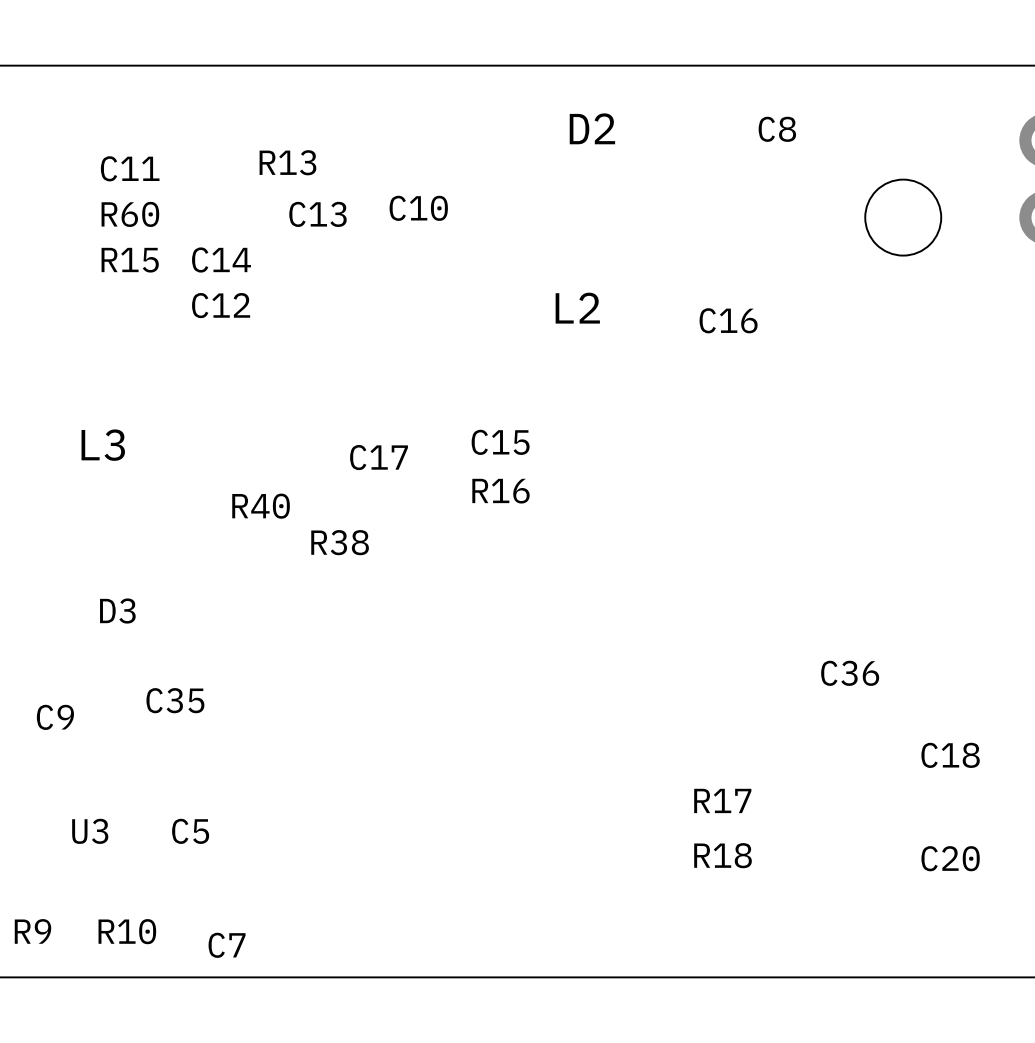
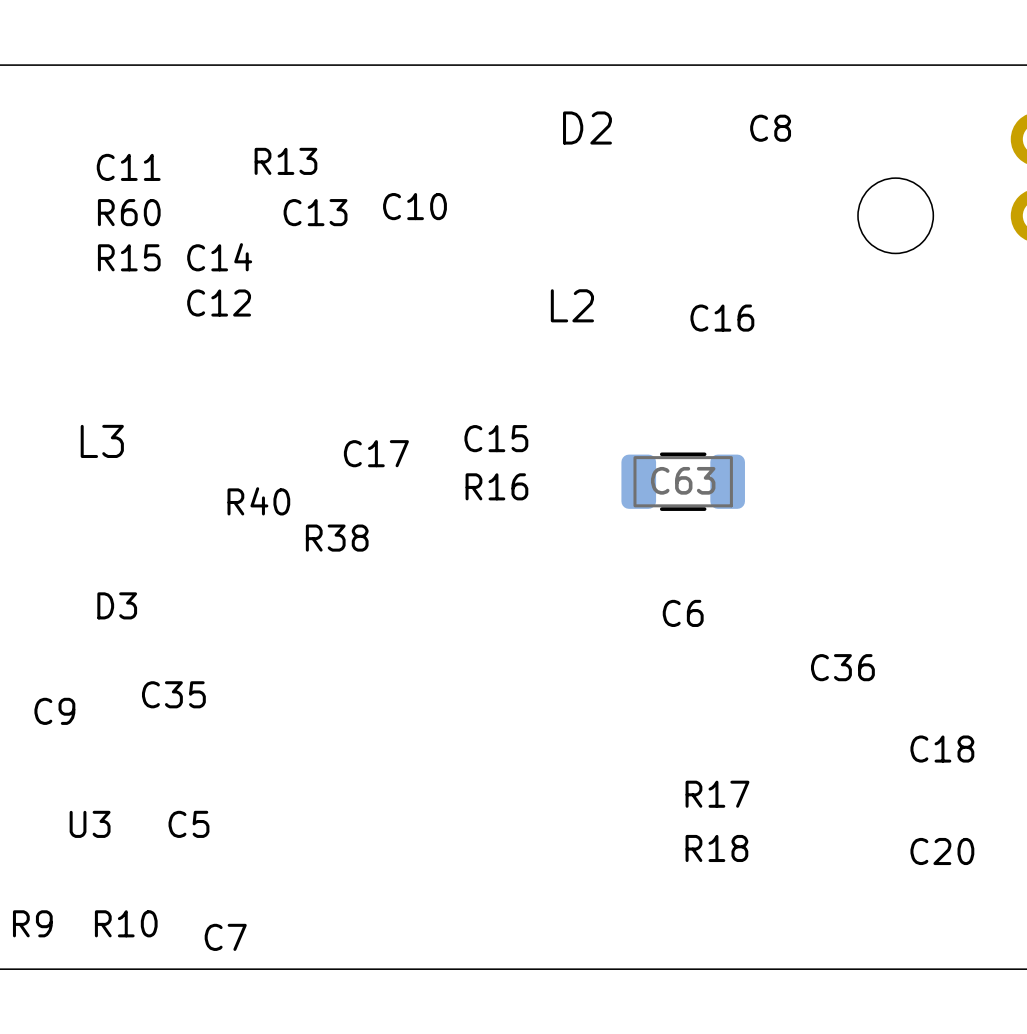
C63: none -> (683, 481)
C6: none -> (683, 613)

